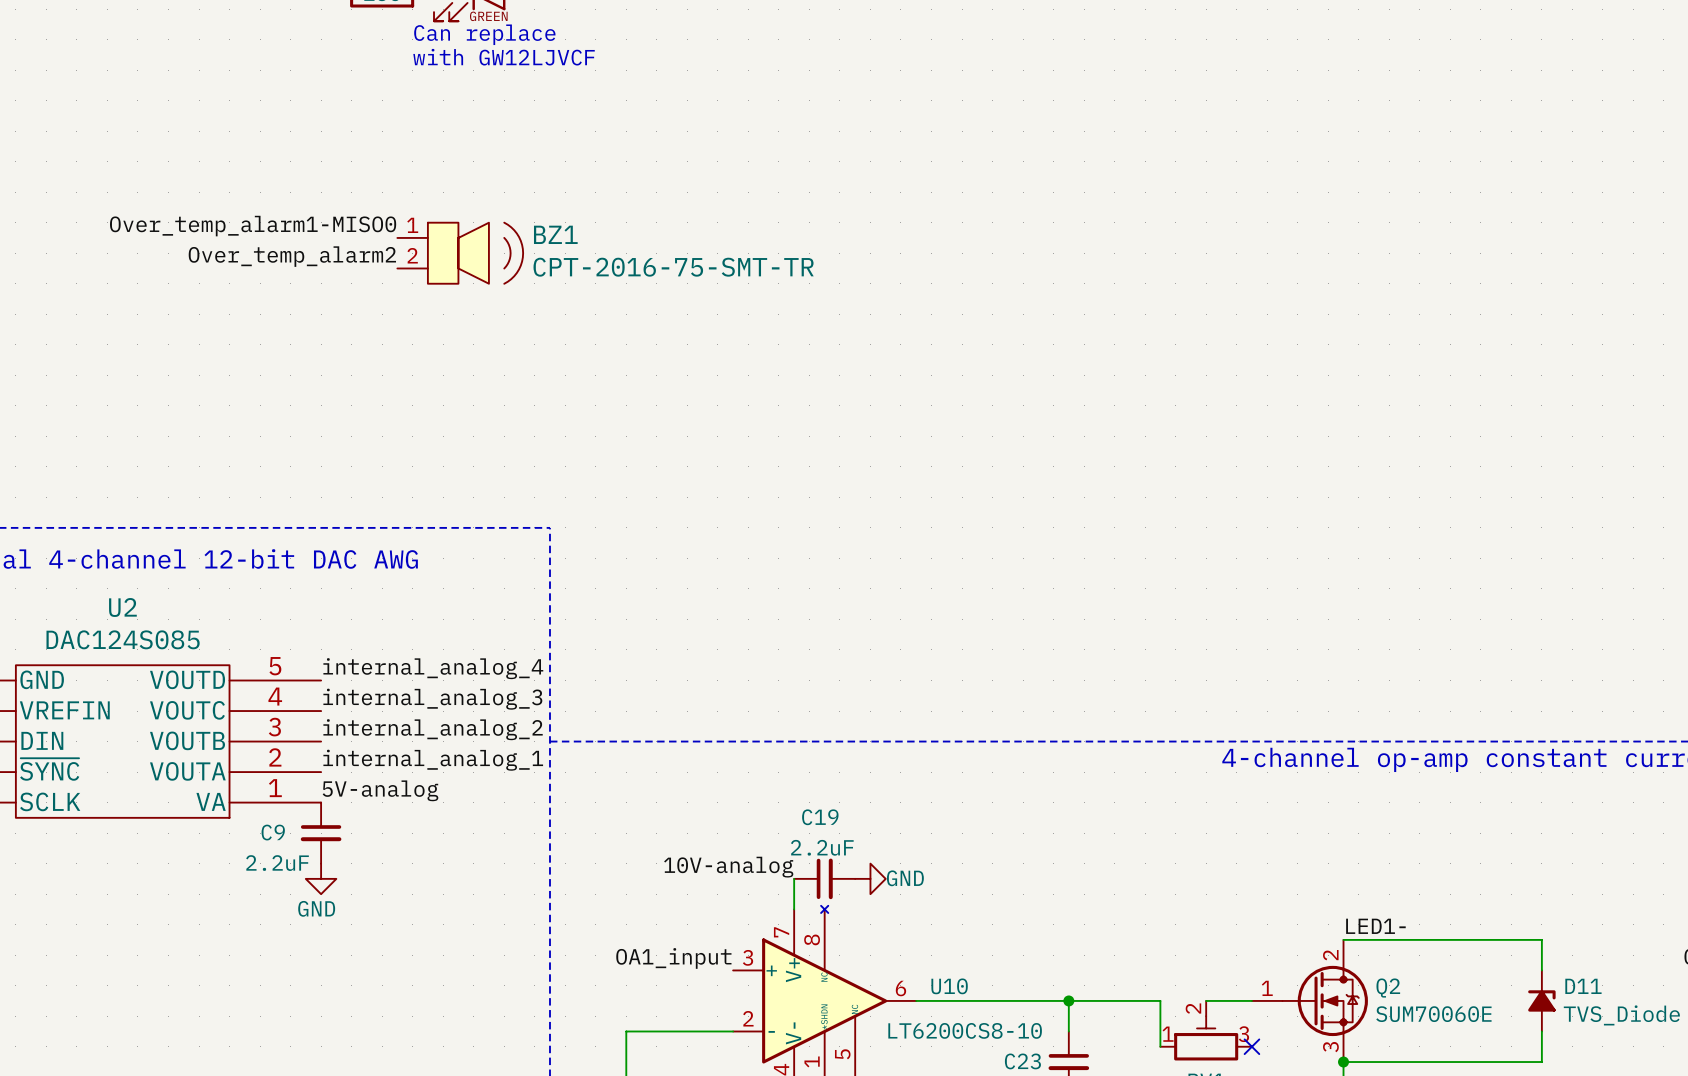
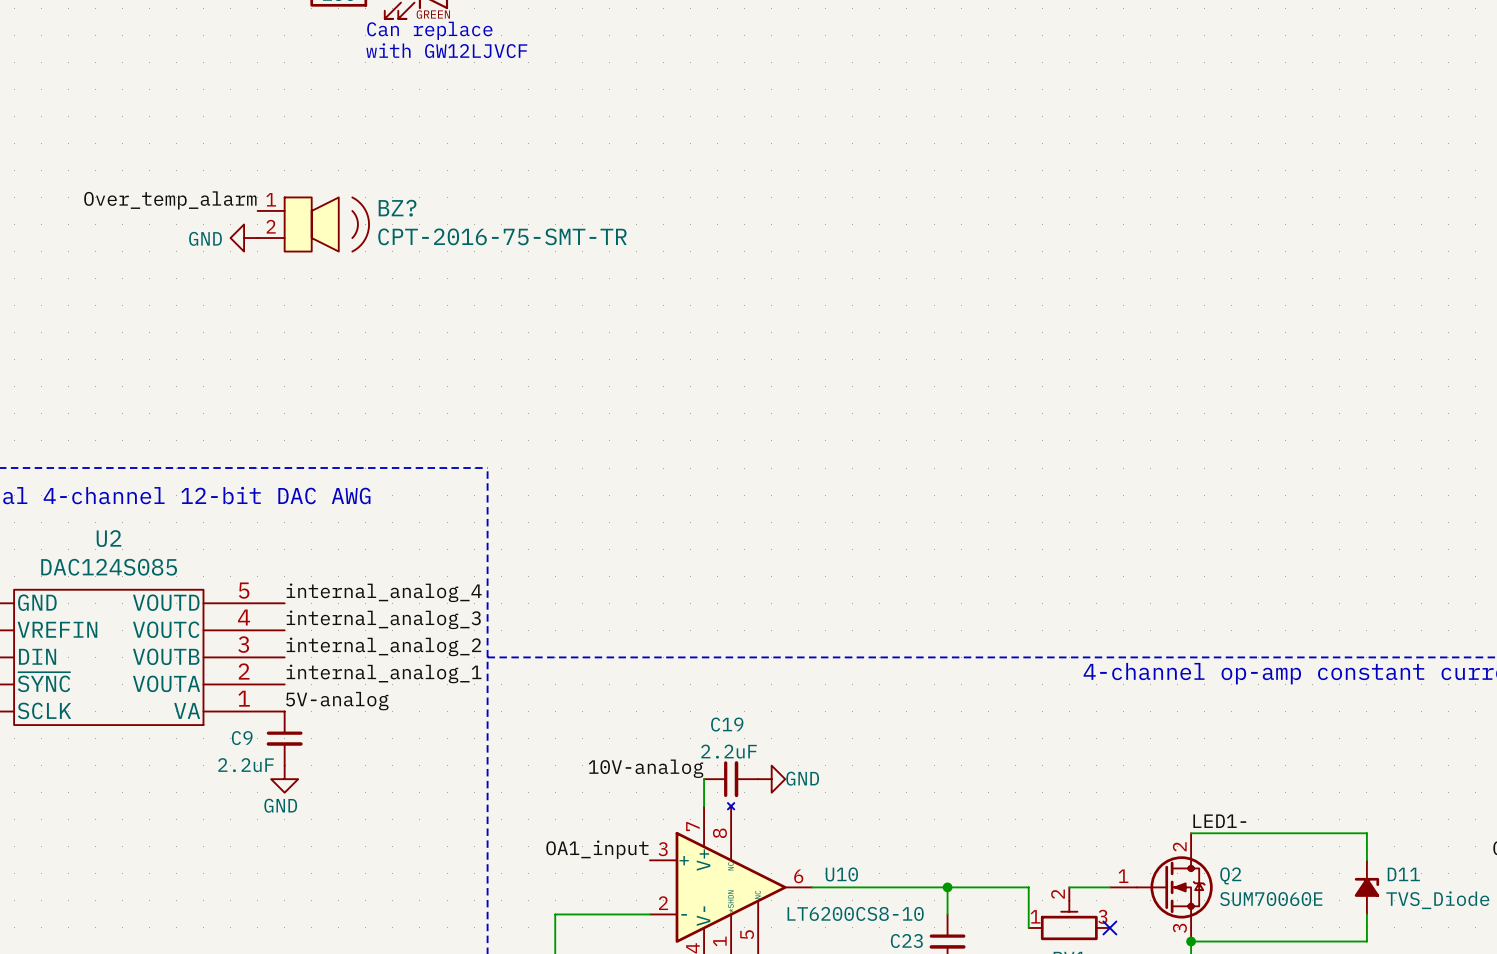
label: none -> Over_temp_alarm (170, 200)
label: Over_temp_alarm1-MISO0 (253, 226) -> none
BZ?: none -> CPT-2016-75-SMT-TR (313, 224)
BZ1: CPT-2016-75-SMT-TR (460, 253) -> none
label: Over_temp_alarm2 (292, 256) -> none
power symbol: none -> GND (244, 238)

